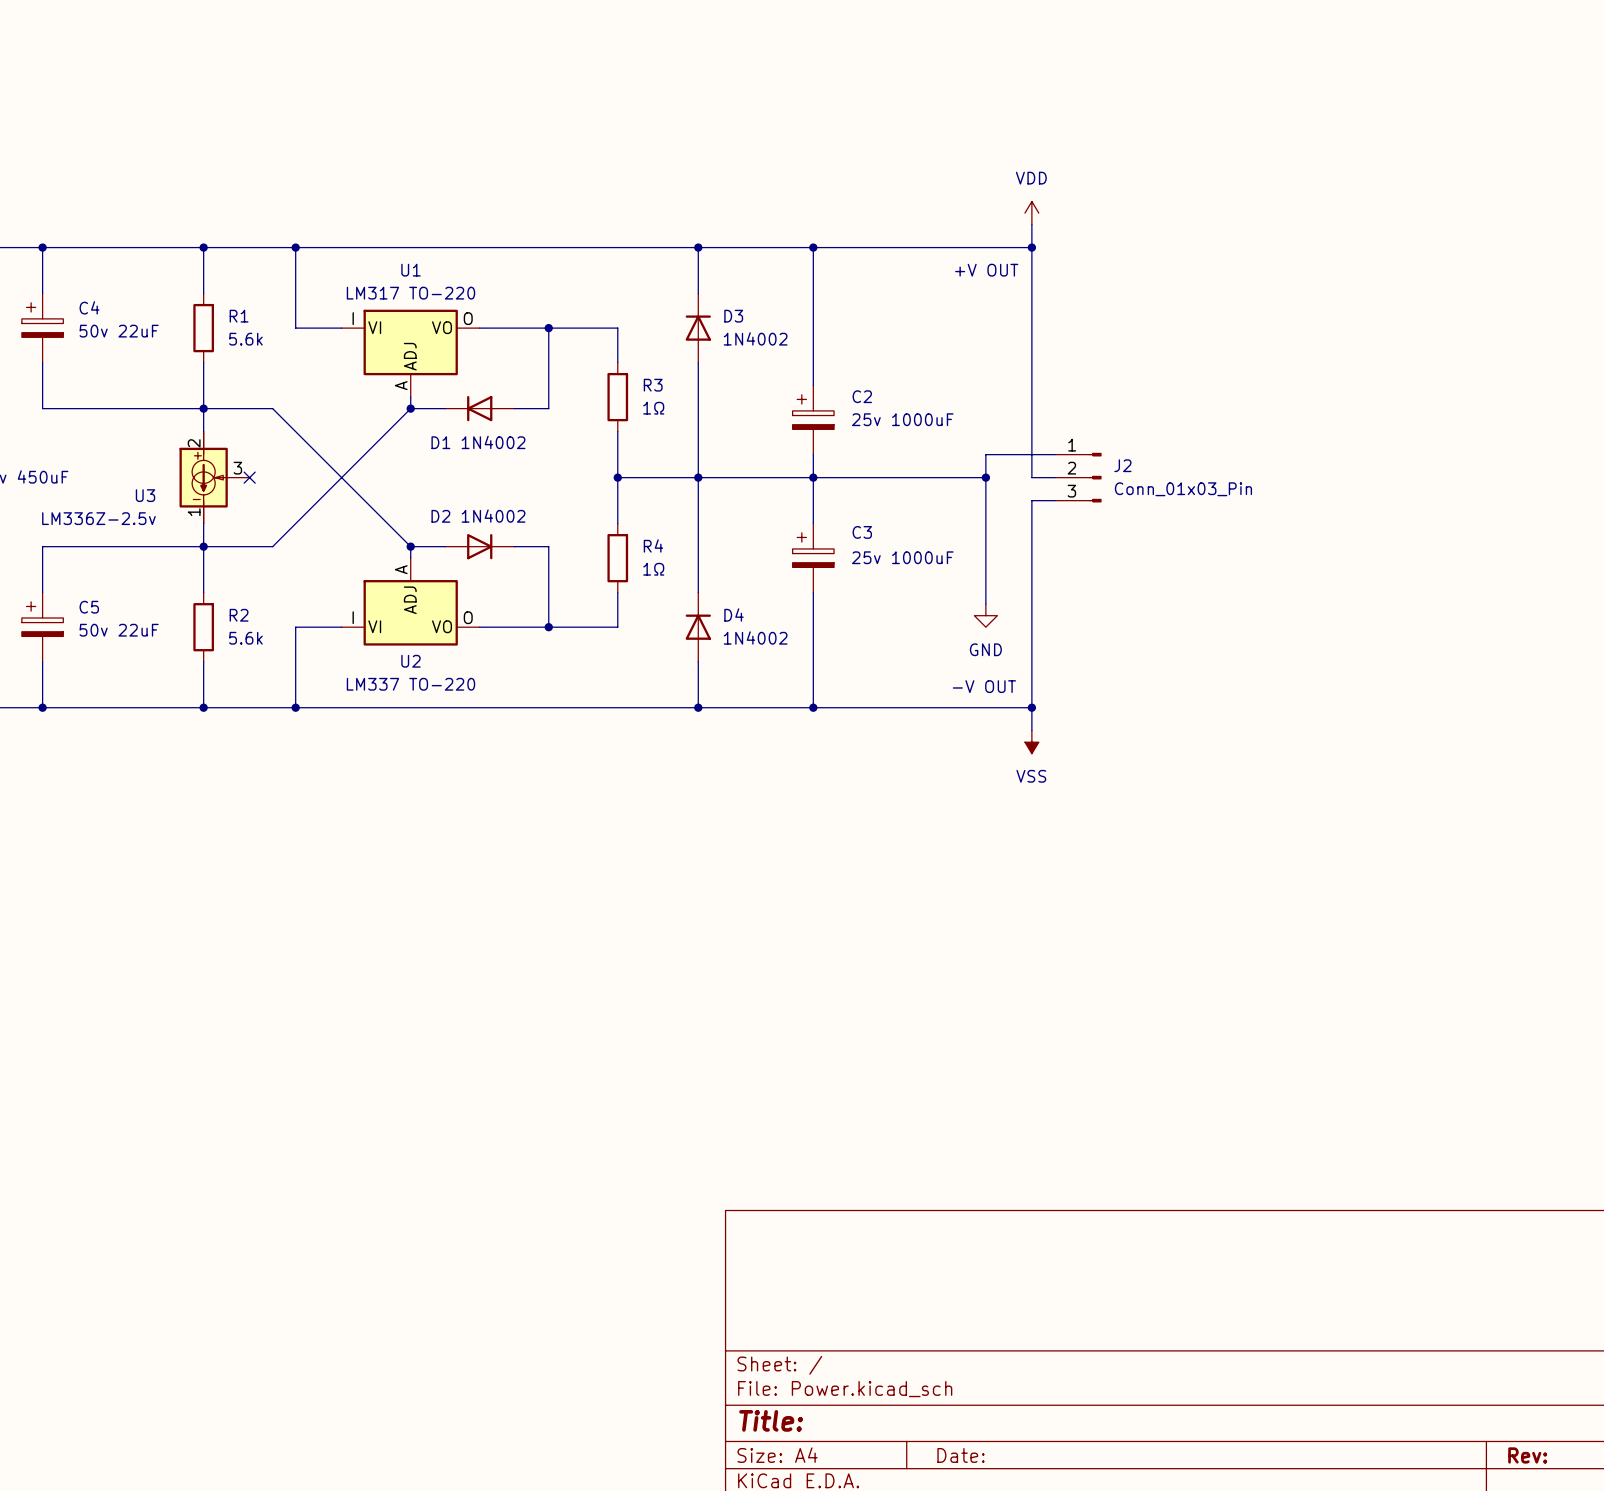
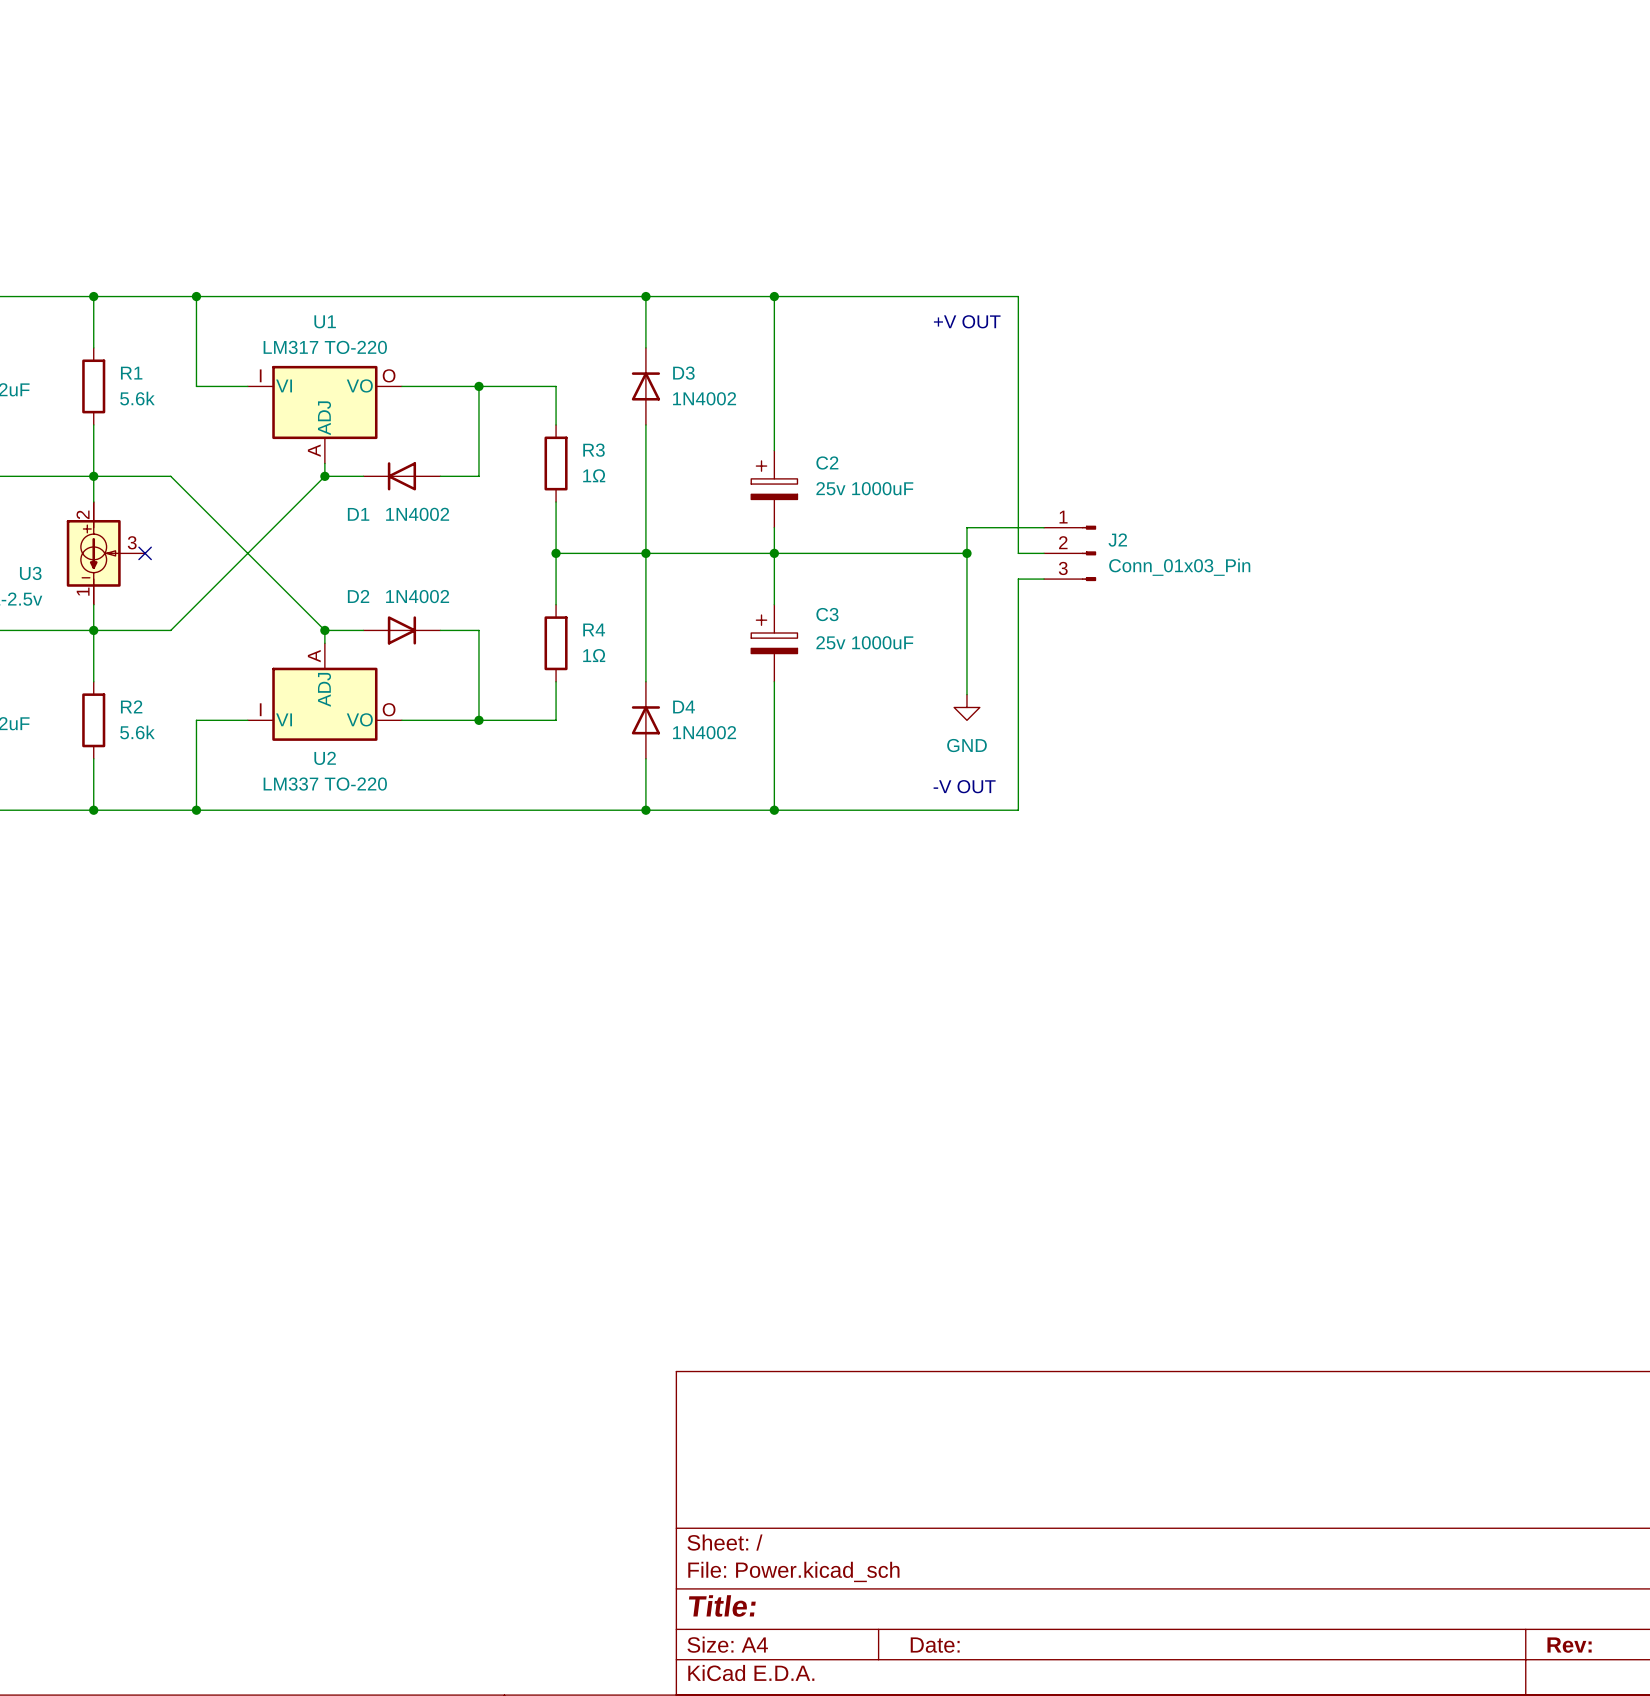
power symbol: VDD (1031, 213) -> none
wire: (1031, 224) (1031, 247) -> none
junction: (1031, 247) -> none
wire: (1031, 707) (1031, 730) -> none
junction: (1031, 707) -> none
power symbol: VSS (1031, 742) -> none

